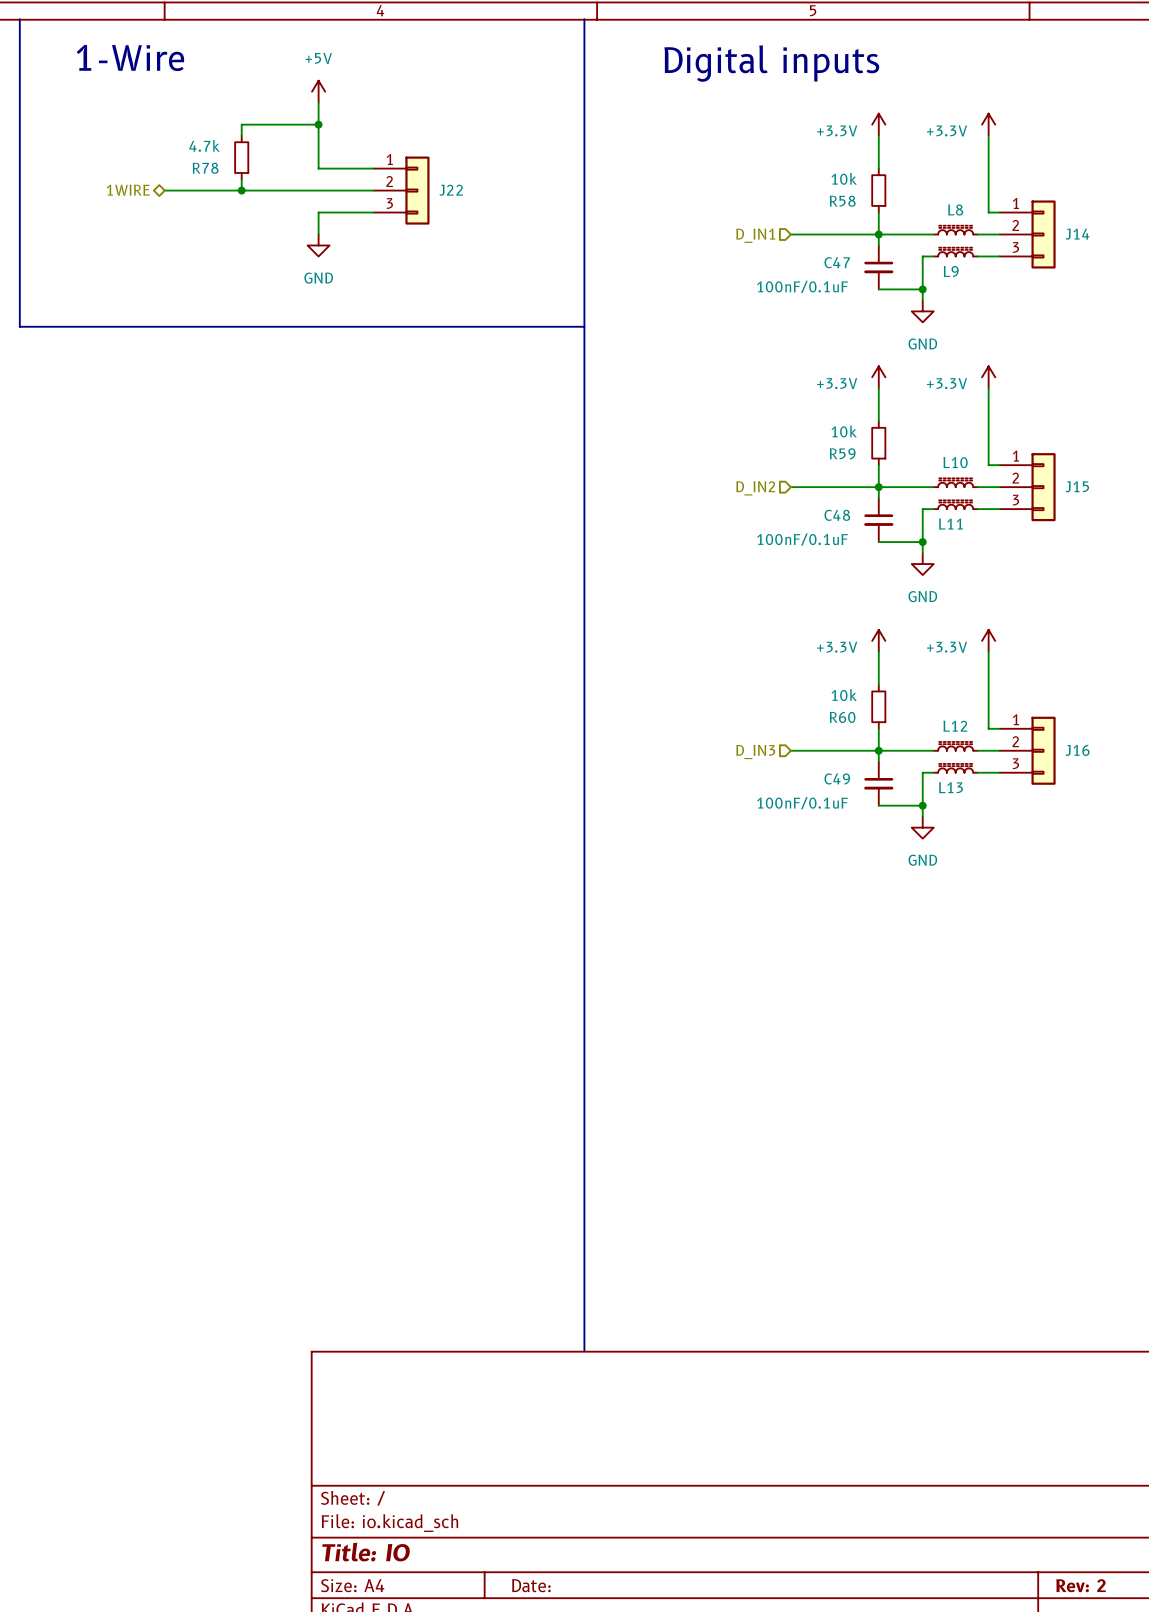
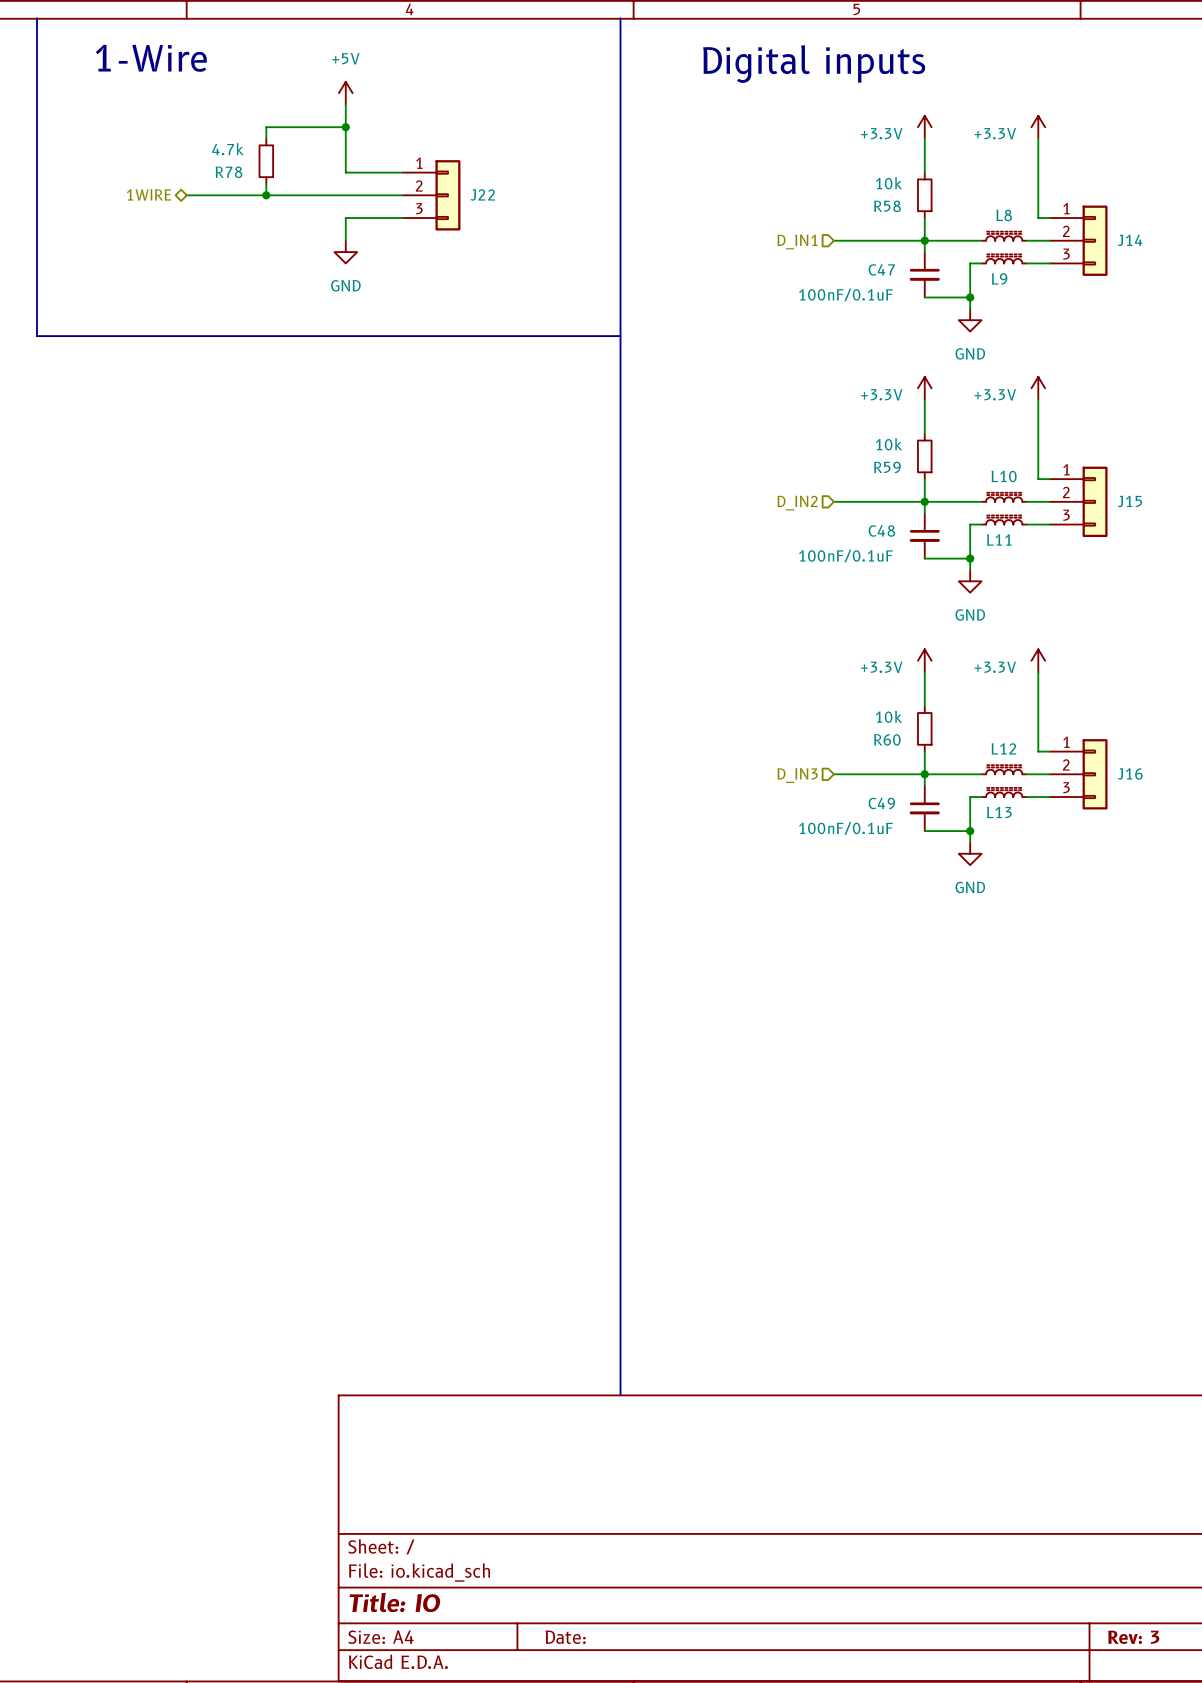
title block: Rev: 2 (1081, 1585) -> Rev: 3 (1133, 1637)

